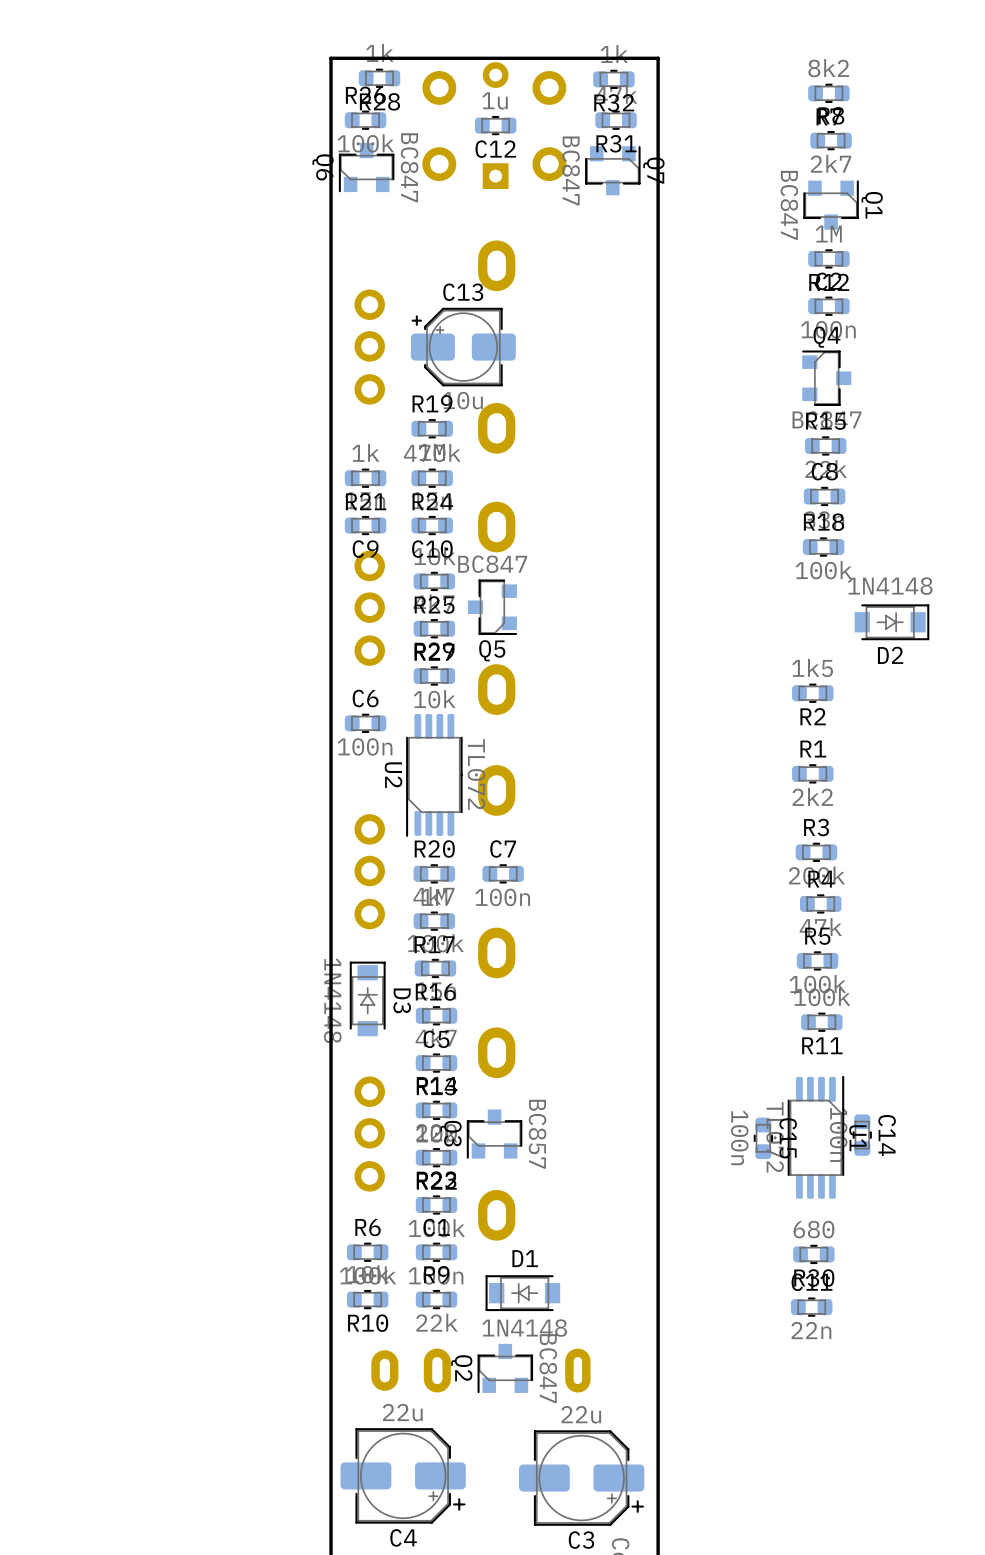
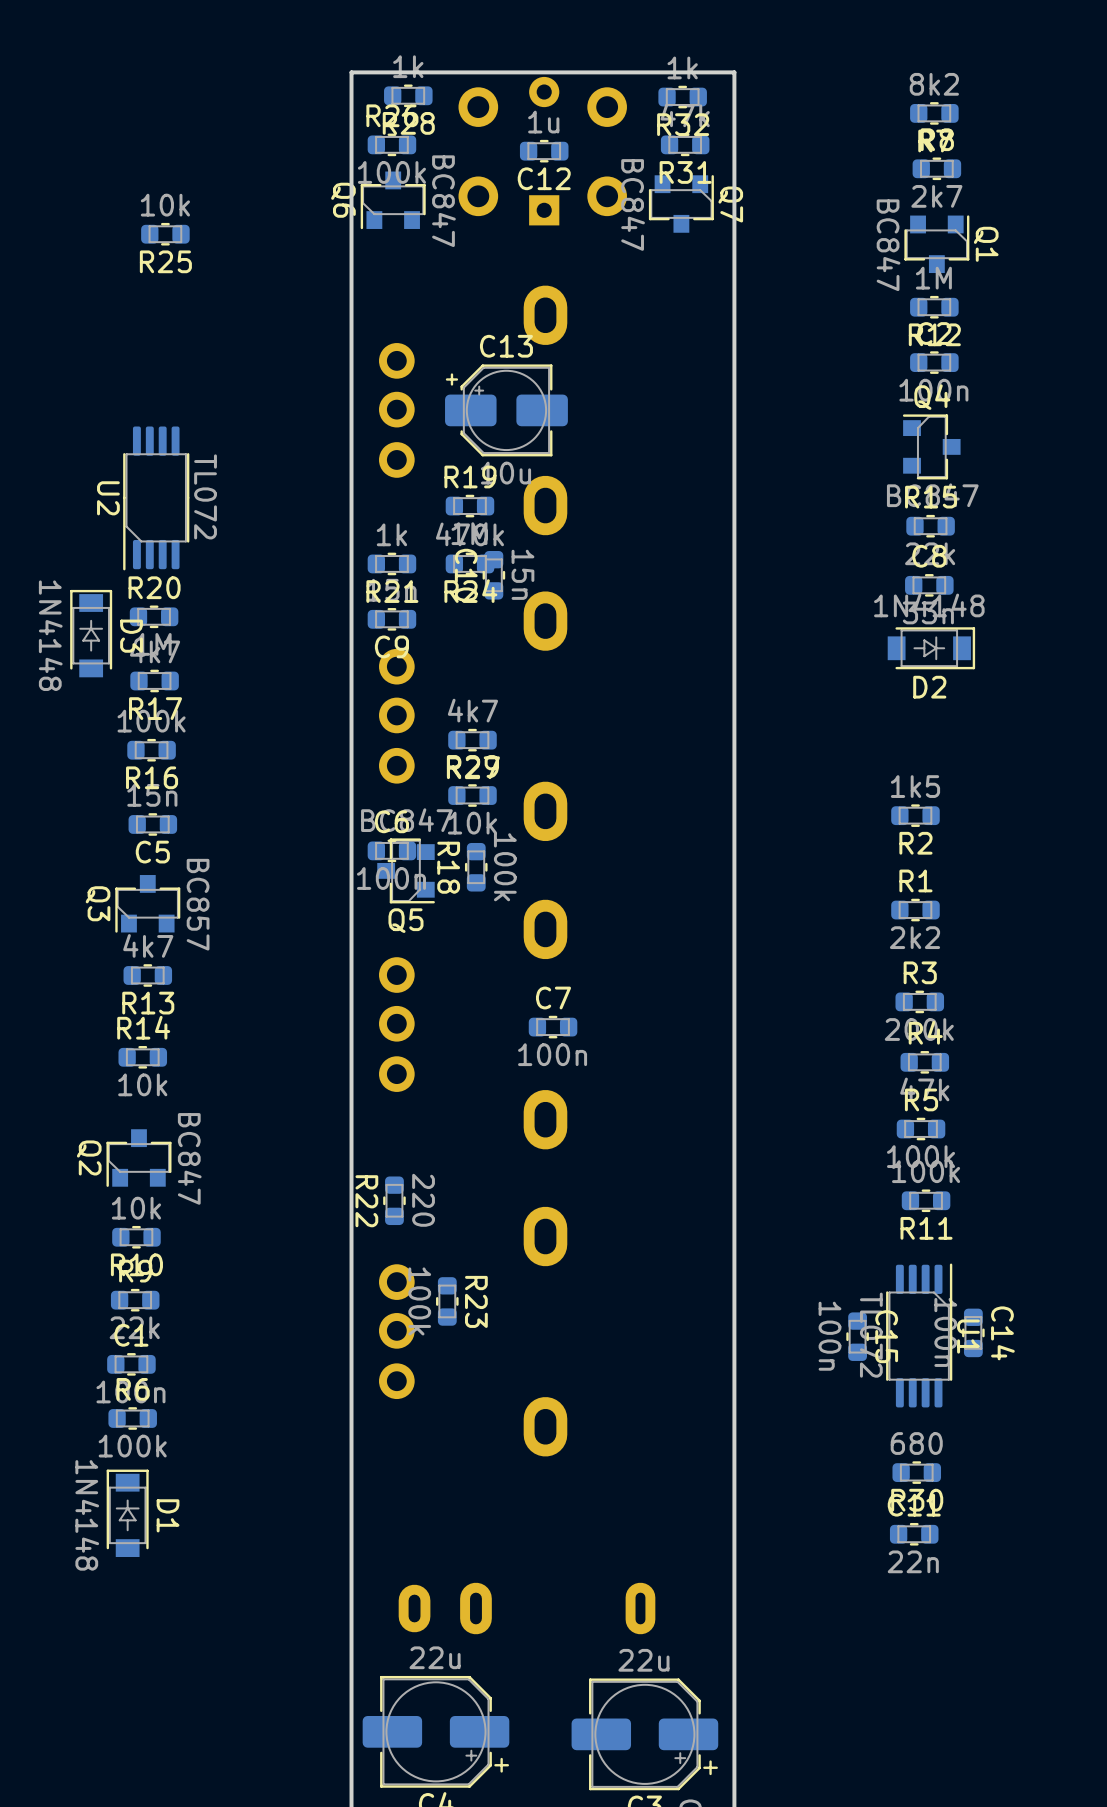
R18 name position: R18 (823, 522) -> R18 (448, 867)
C10 rotation: 0° (432, 525) -> 90° clockwise (493, 575)
C10 position: (432, 525) -> (493, 575)
R18 rotation: 0° (823, 547) -> 90° clockwise (476, 867)
R18 position: (823, 547) -> (476, 867)
R18 value position: 100k (823, 570) -> 100k (505, 867)
R25 position: (434, 581) -> (165, 234)
Q5 position: (492, 607) -> (406, 870)
D2 position: (891, 622) -> (931, 648)
U2 position: (434, 775) -> (156, 498)
R20 position: (434, 873) -> (154, 616)
R17 position: (434, 921) -> (154, 680)
R16 position: (435, 968) -> (151, 750)
D3 position: (367, 998) -> (91, 633)
C5 position: (436, 1015) -> (152, 824)
R13 position: (436, 1063) -> (147, 975)
R14 position: (436, 1110) -> (142, 1057)
Q3 position: (494, 1134) -> (147, 903)
R22 rotation: 0° (436, 1157) -> 90° clockwise (394, 1200)
R22 position: (436, 1157) -> (394, 1200)
R23 rotation: 0° (436, 1204) -> 90° clockwise (447, 1301)
R23 position: (436, 1204) -> (447, 1301)
R6 position: (367, 1252) -> (132, 1418)
C1 position: (436, 1252) -> (131, 1364)
D1 rotation: 0° (522, 1293) -> 90° clockwise (127, 1513)
D1 position: (522, 1293) -> (127, 1513)
R10 position: (367, 1299) -> (136, 1237)
R9 position: (436, 1299) -> (135, 1300)
Q2 position: (505, 1368) -> (138, 1158)

